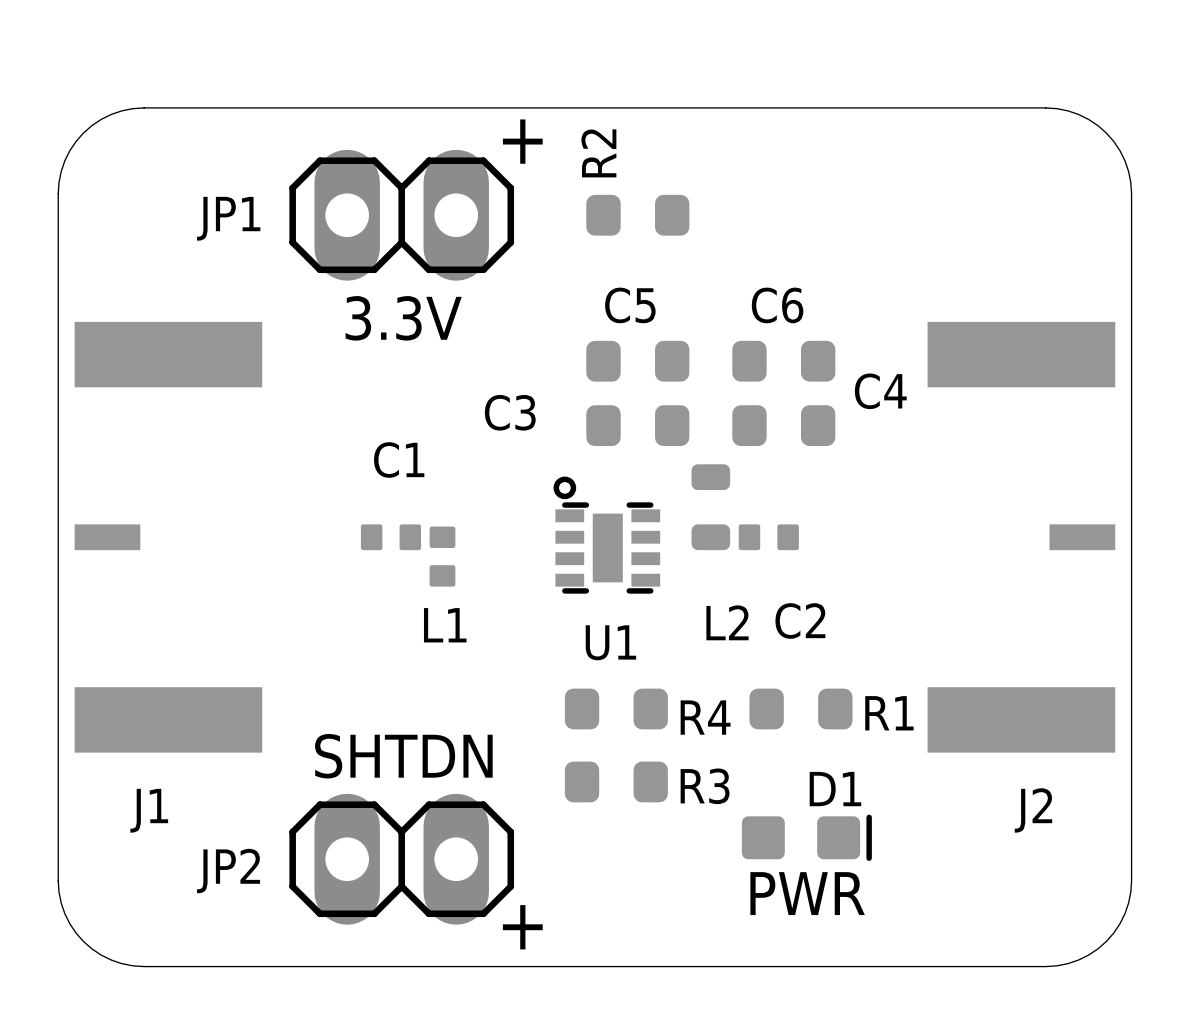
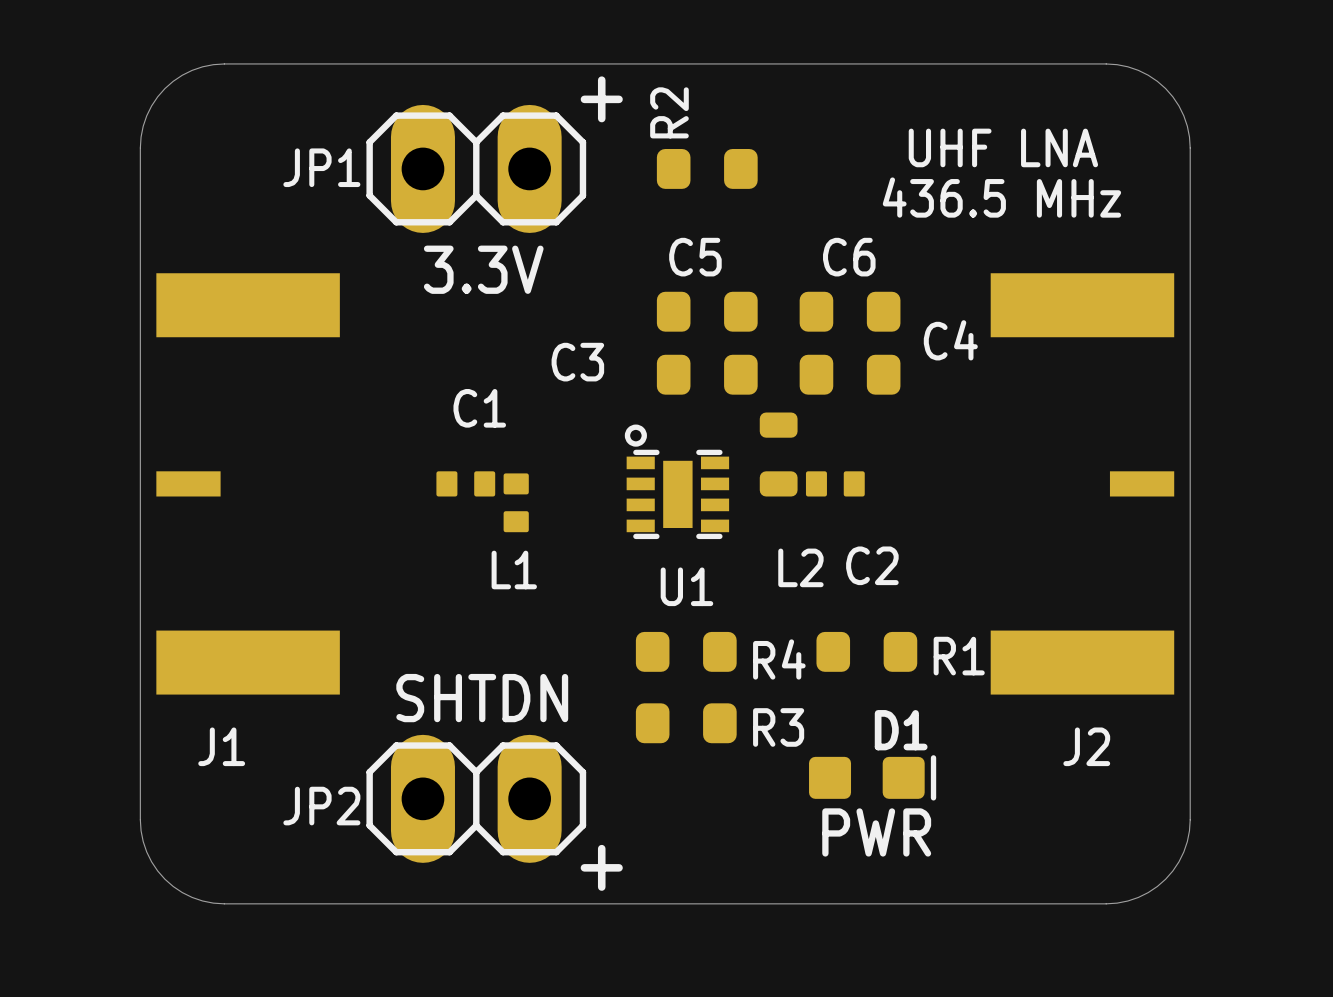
text: none -> UHF LNA (1003, 147)
text: none -> 436.5 MHz (1001, 197)

